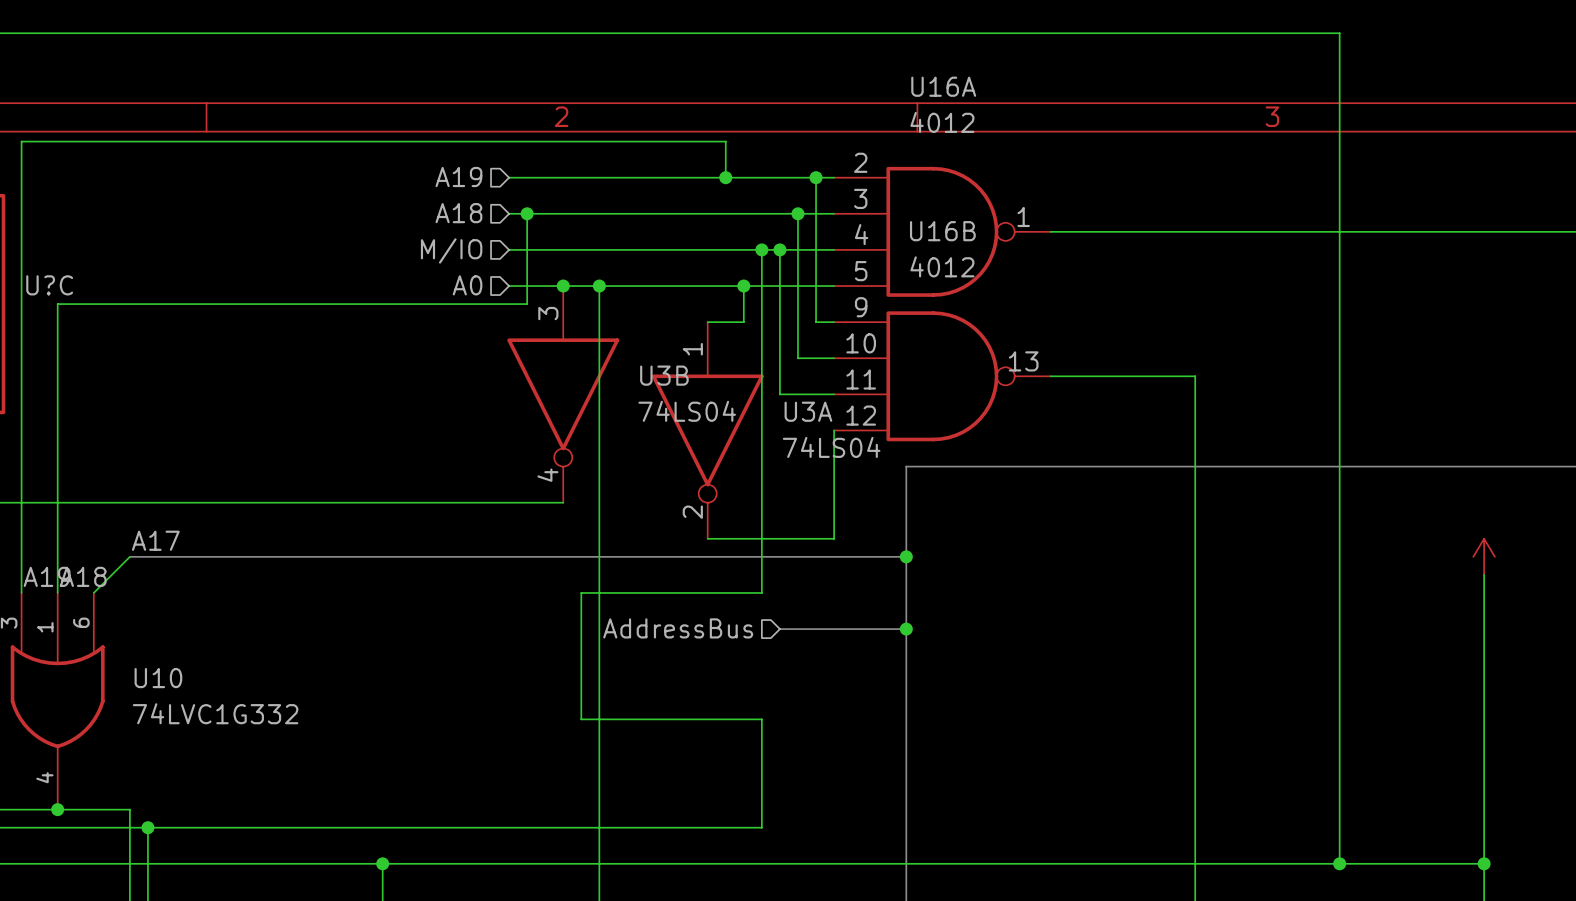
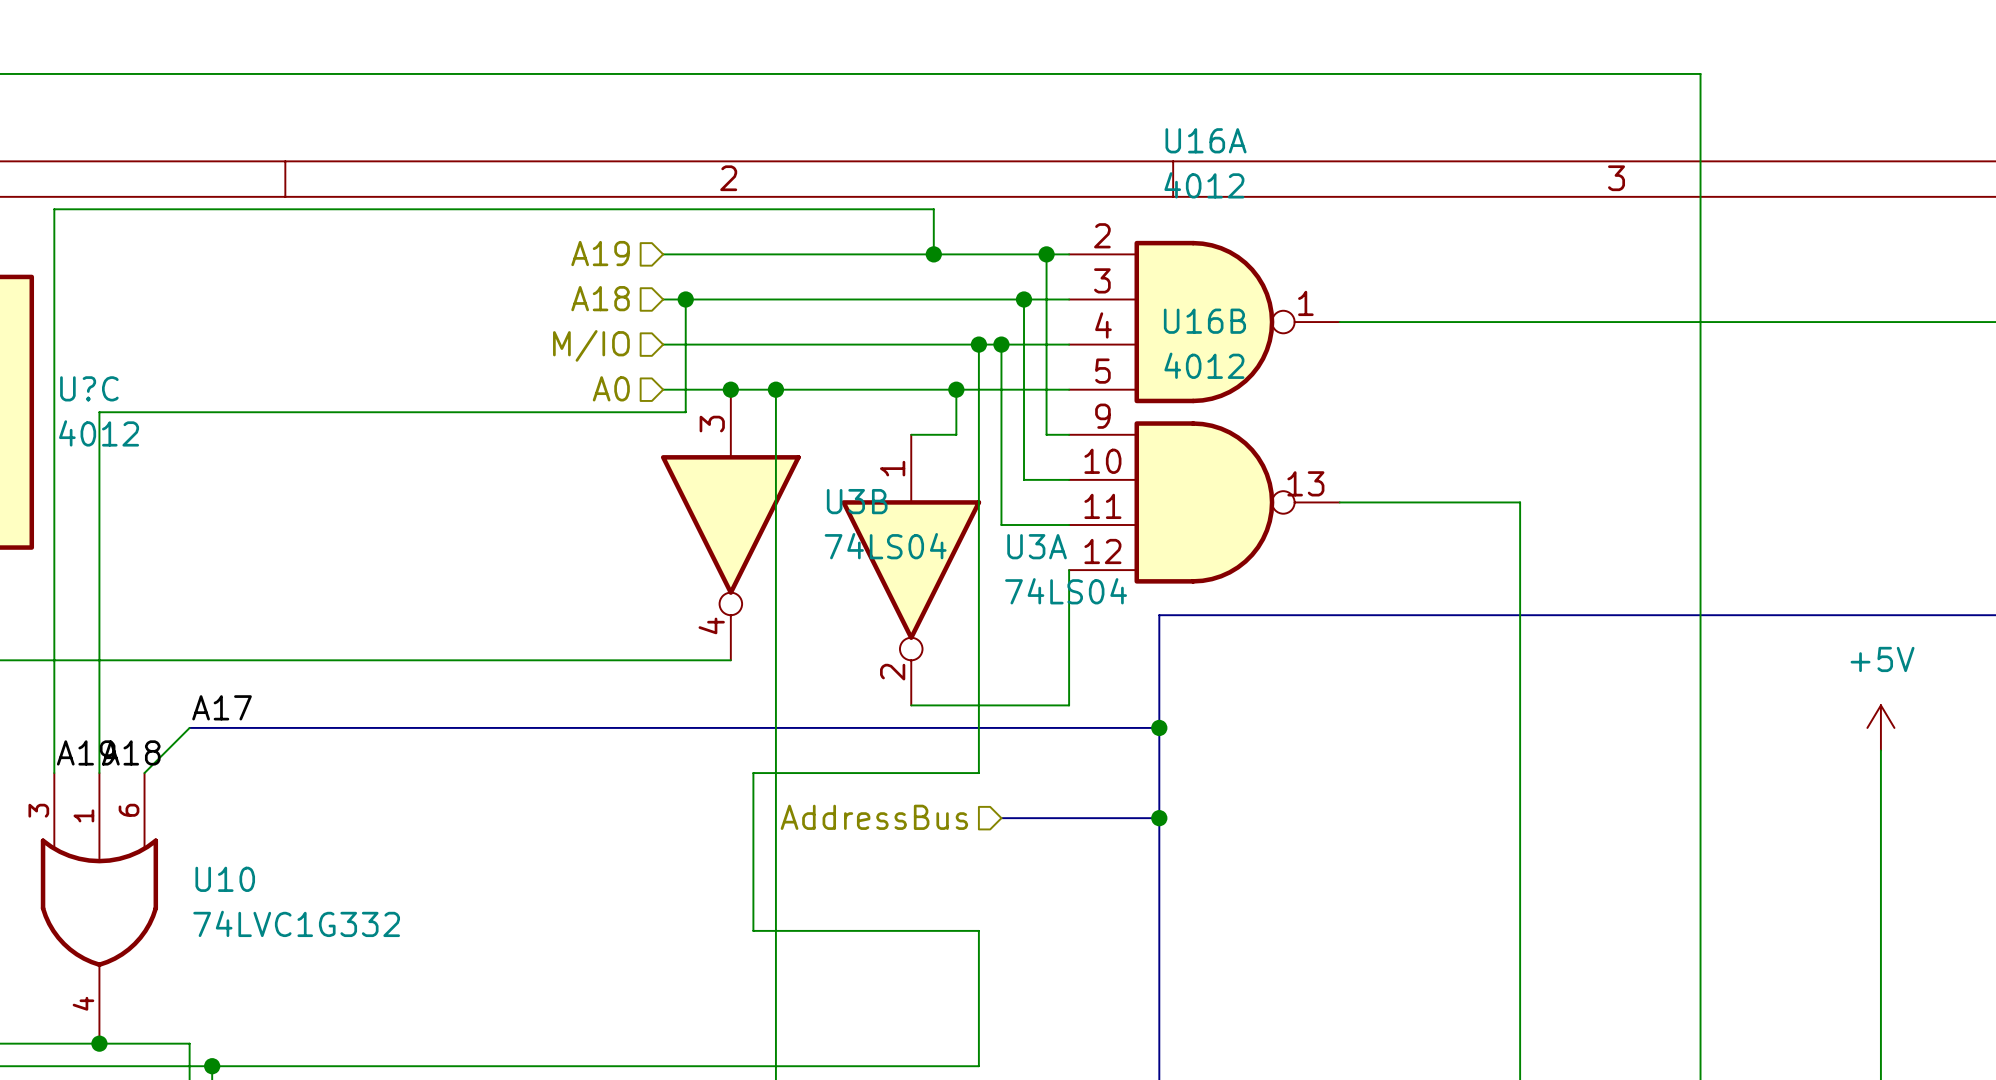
U?C value: none -> 4012 (99, 433)
power symbol text: none -> +5V (1882, 659)

